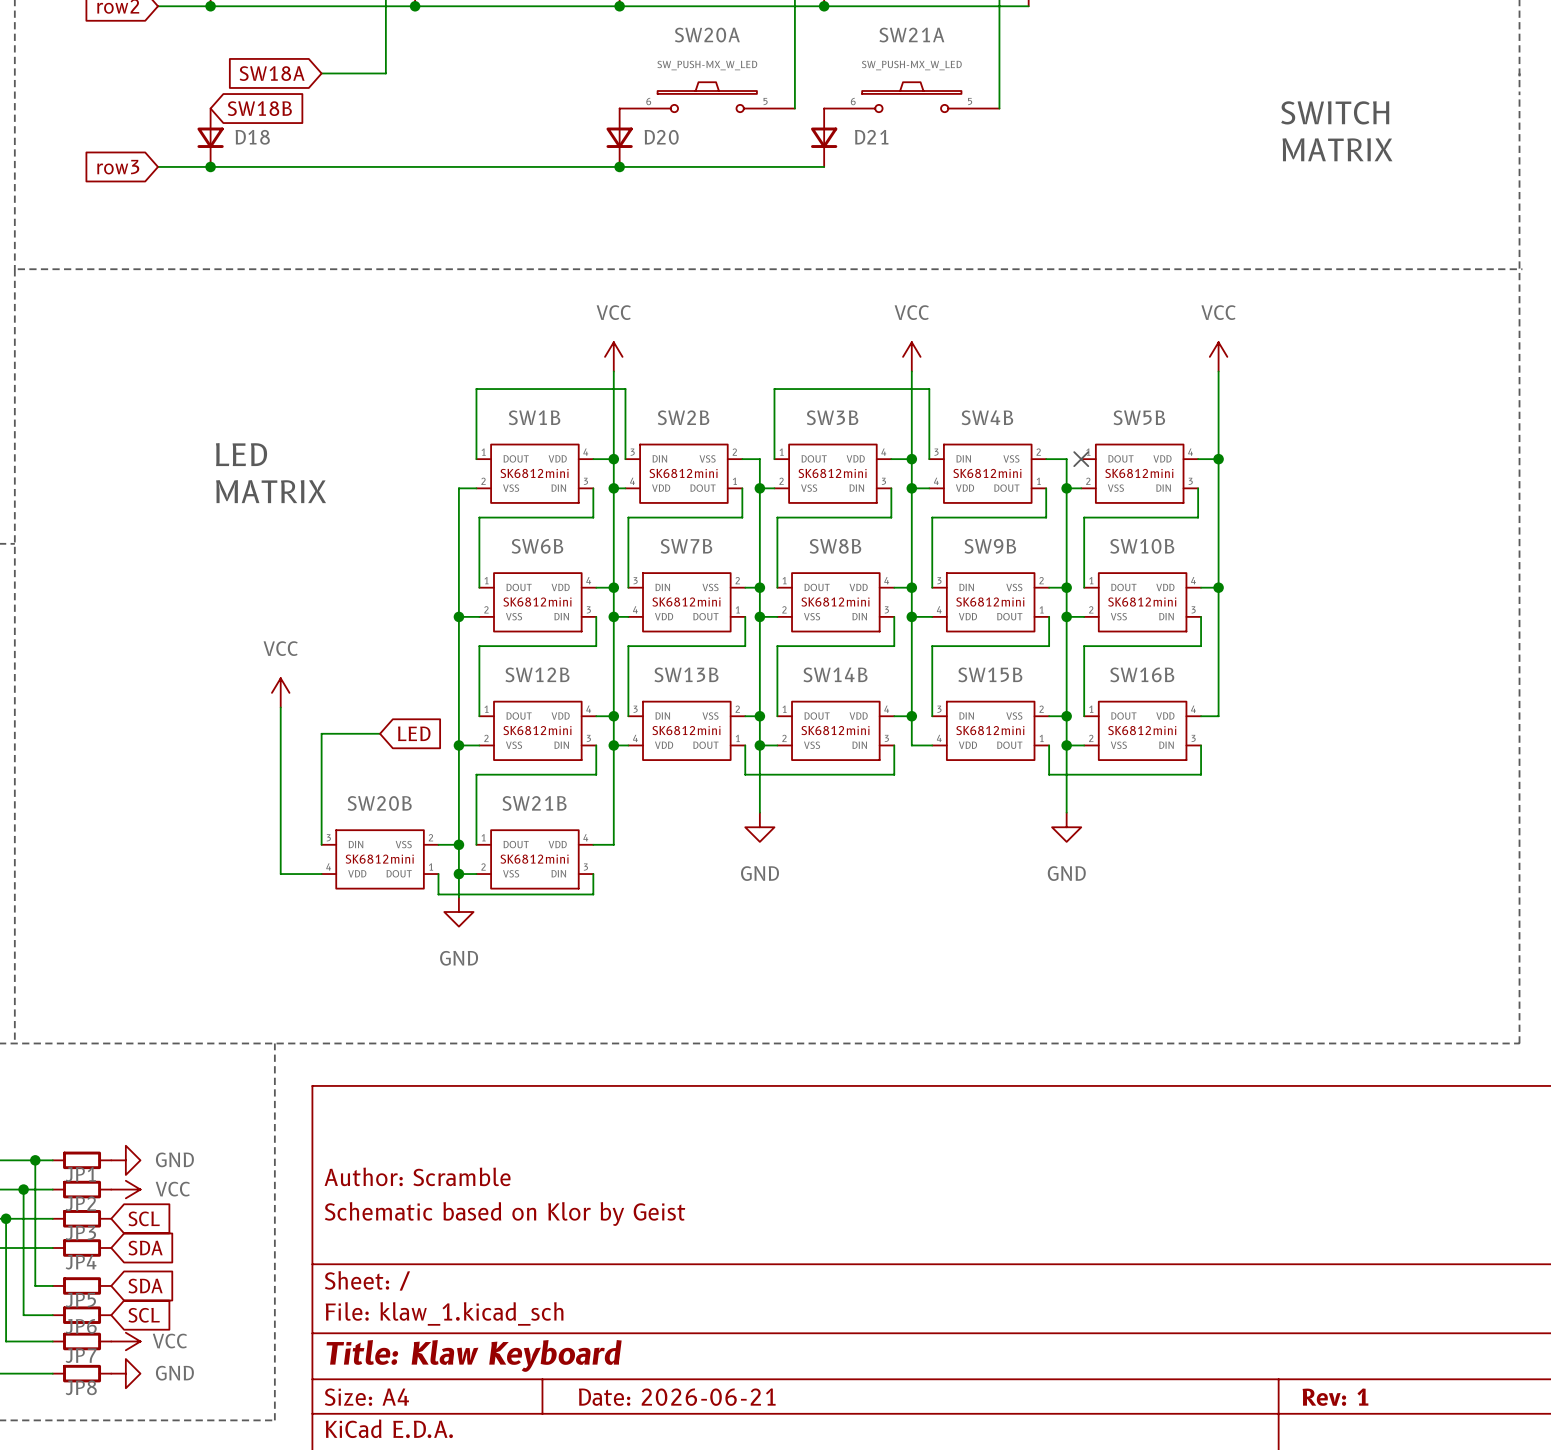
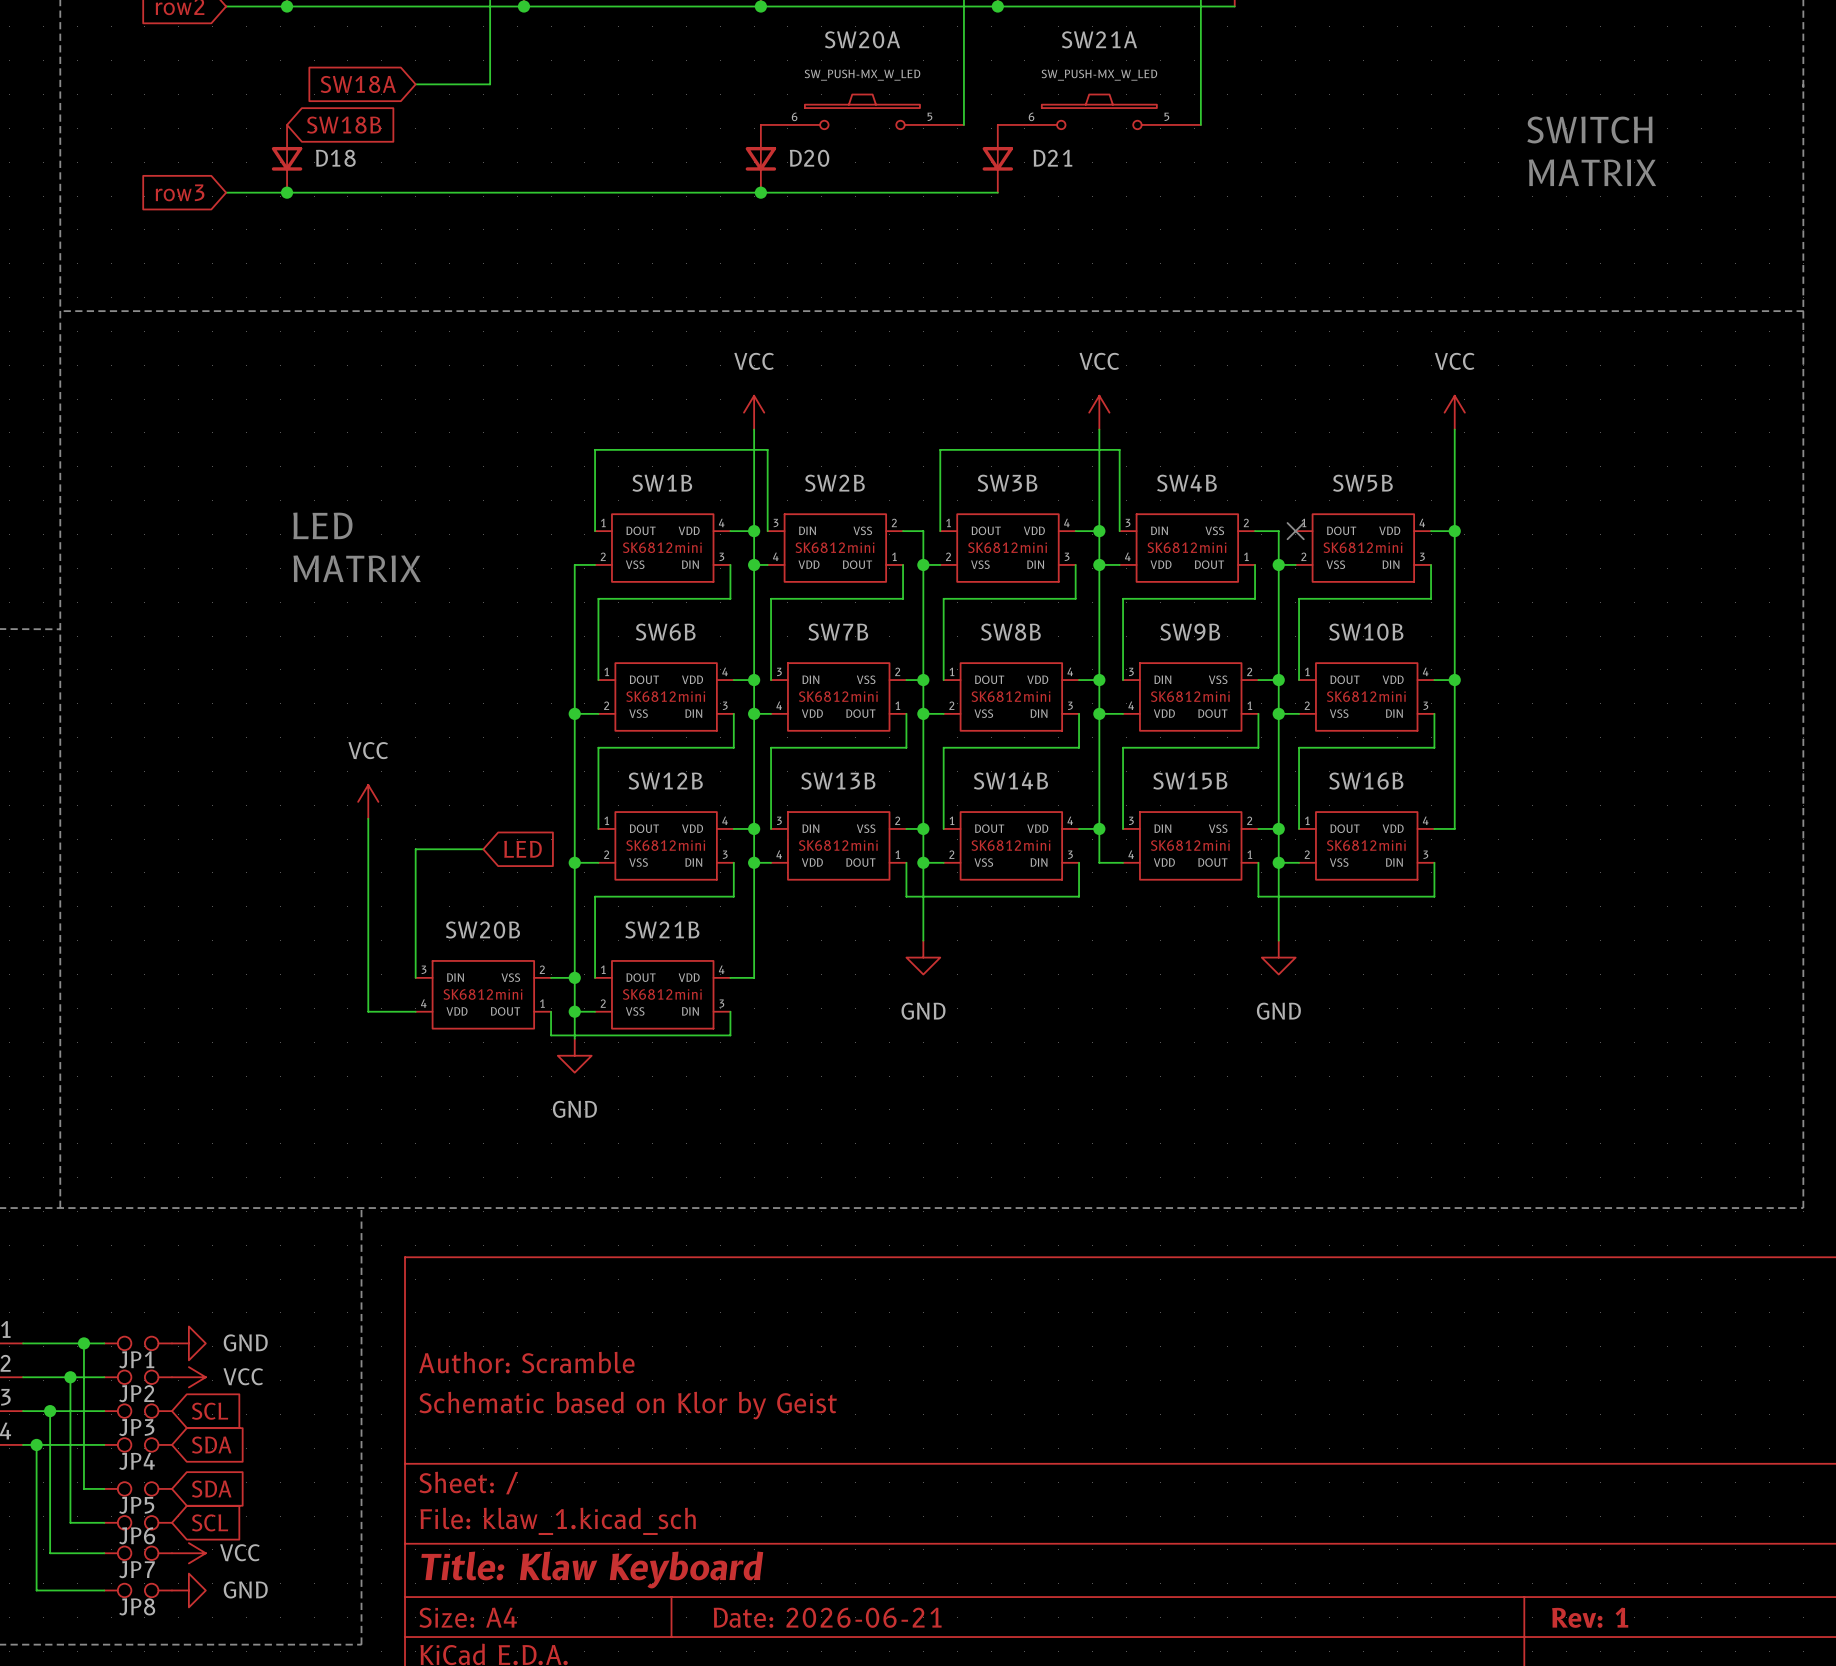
JP1 symbol: [52, 1151, 112, 1170] -> [104, 1336, 172, 1351]
JP2 symbol: [52, 1180, 112, 1199] -> [104, 1370, 172, 1385]
JP3 symbol: [52, 1210, 112, 1228] -> [104, 1404, 172, 1418]
JP4 symbol: [52, 1239, 112, 1257] -> [104, 1438, 172, 1452]
JP5 symbol: [52, 1277, 112, 1295] -> [104, 1482, 172, 1496]
JP6 symbol: [52, 1306, 112, 1324] -> [104, 1516, 172, 1530]
JP7 symbol: [52, 1332, 112, 1351] -> [104, 1546, 172, 1561]
JP8 symbol: [52, 1364, 112, 1383] -> [104, 1583, 172, 1598]

